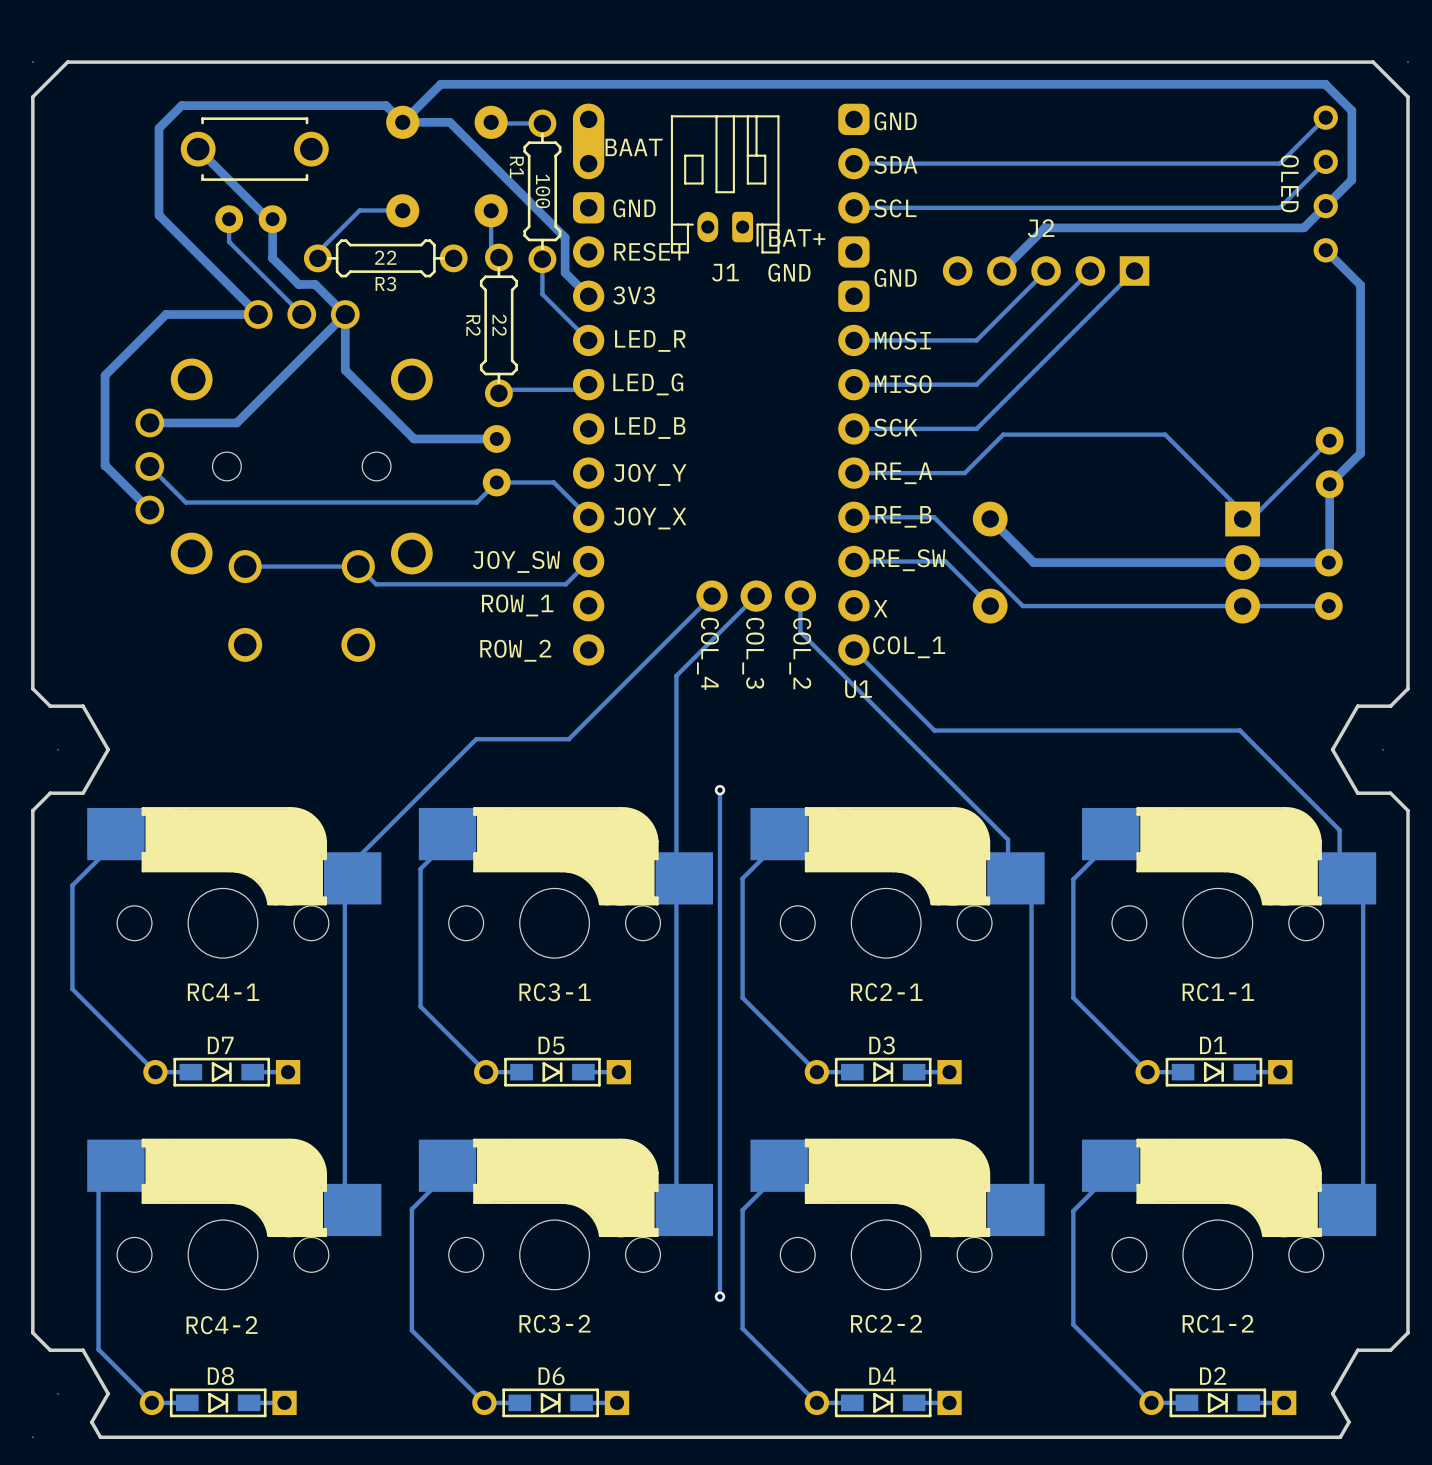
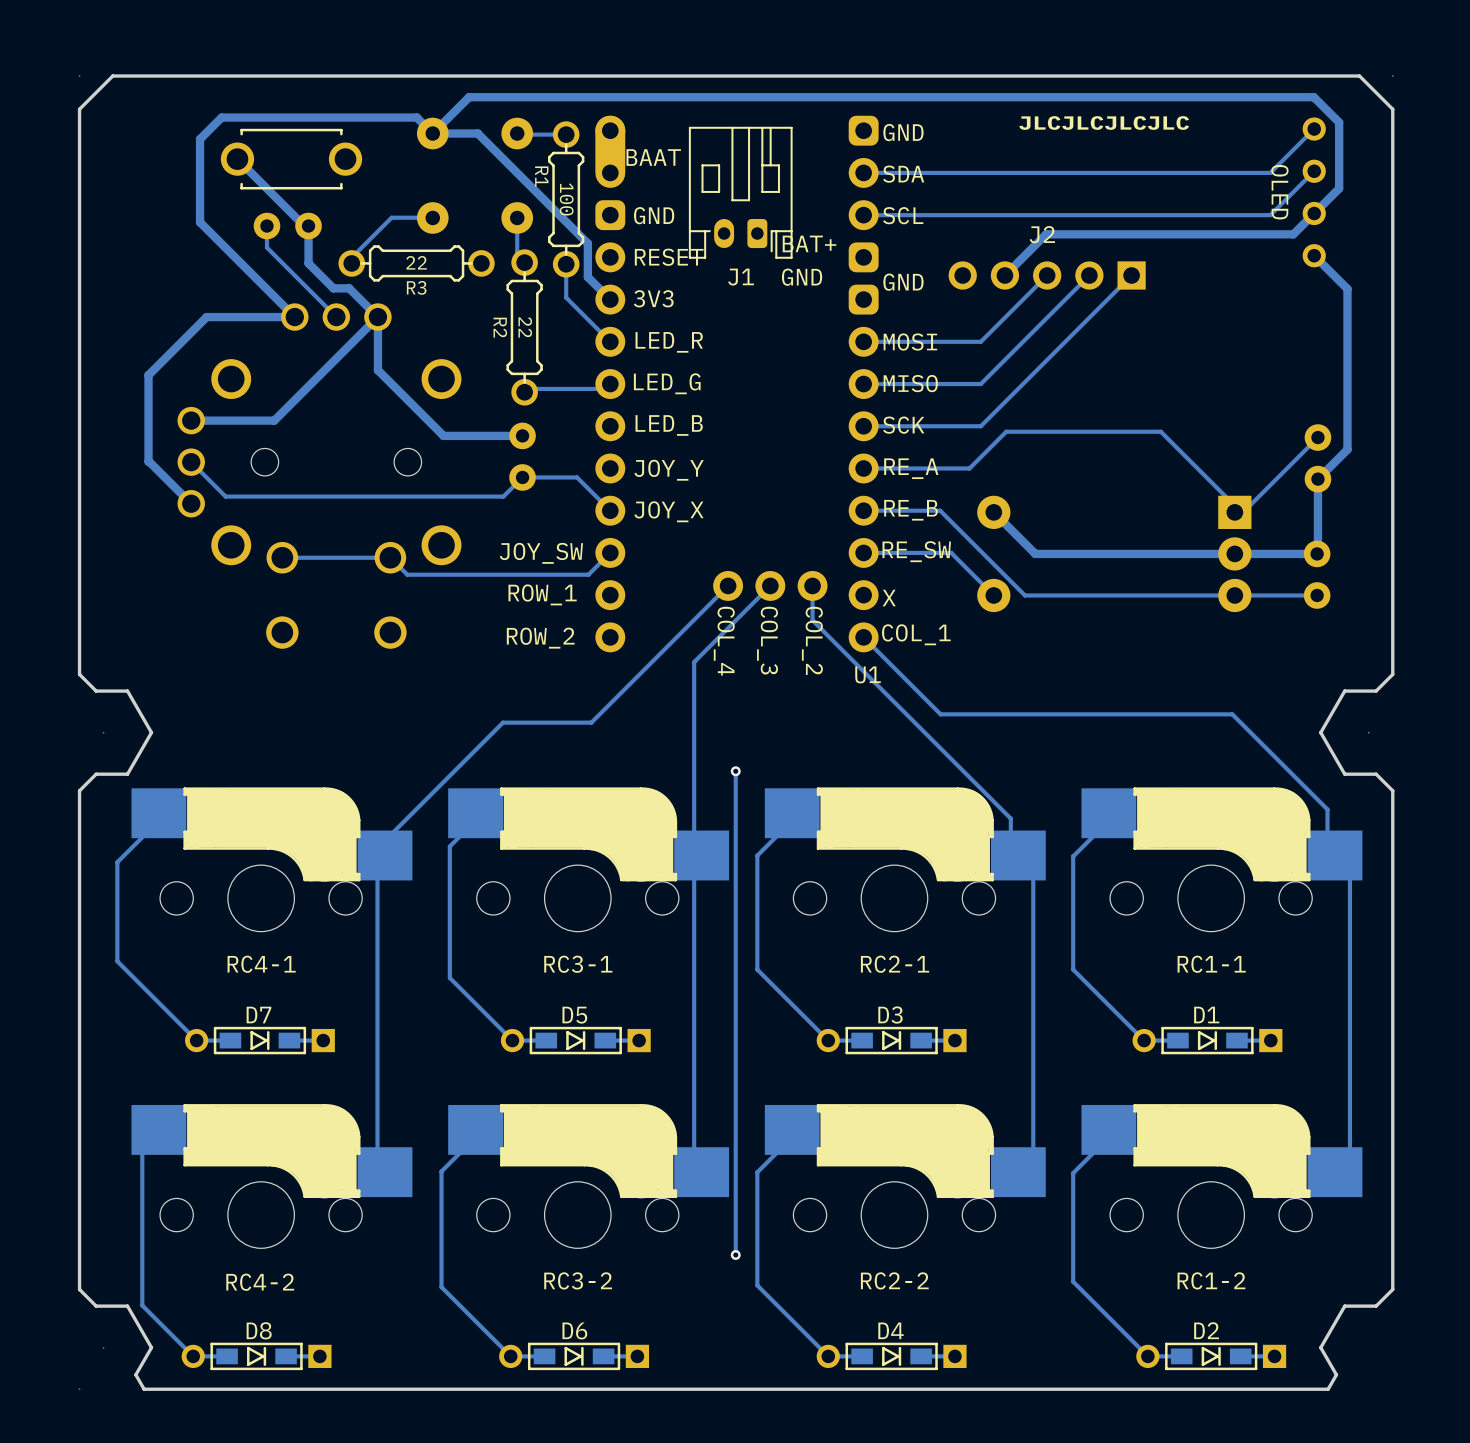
text: none -> JLCJLCJLCJLC (1104, 123)

